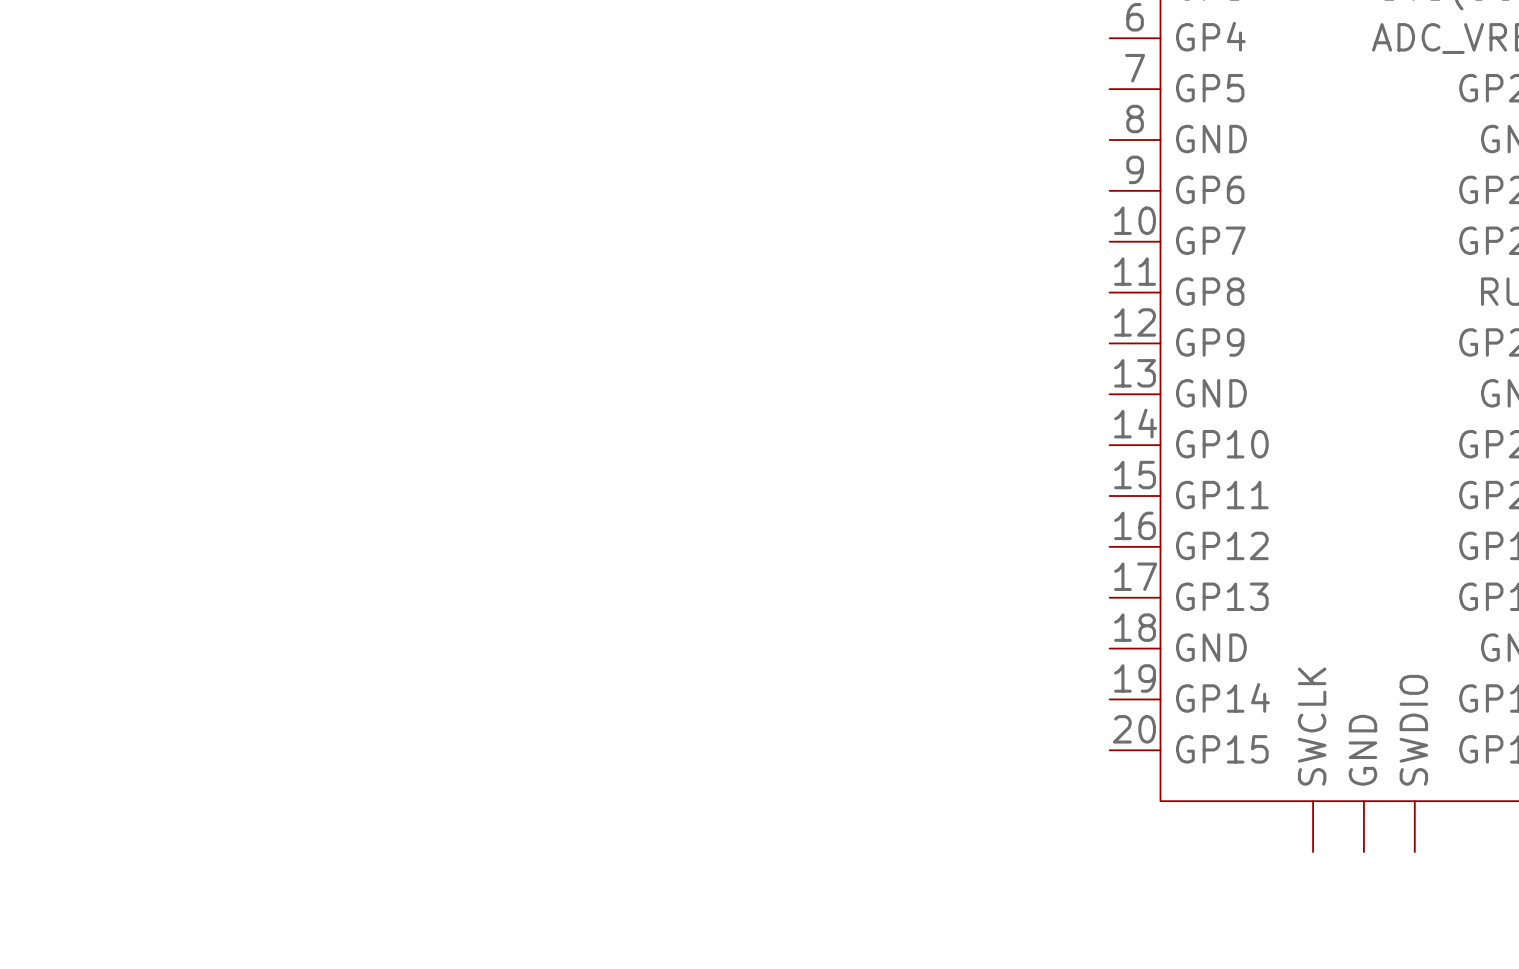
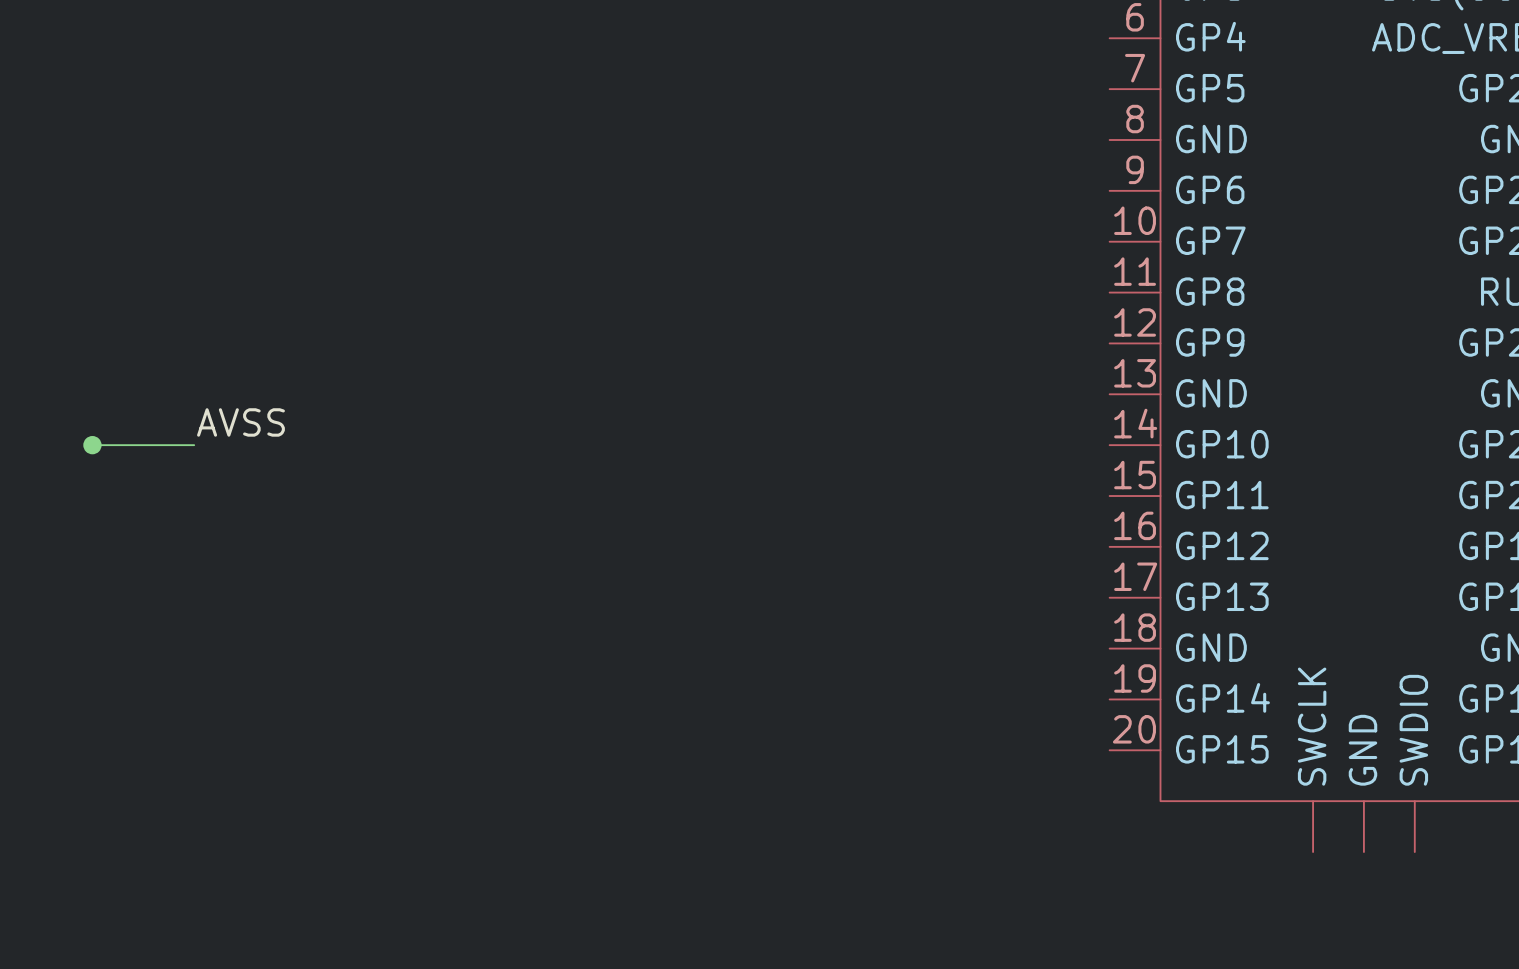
label: none -> AVSS (240, 422)
wire: none -> (92, 445) (194, 445)
junction: none -> (92, 445)

